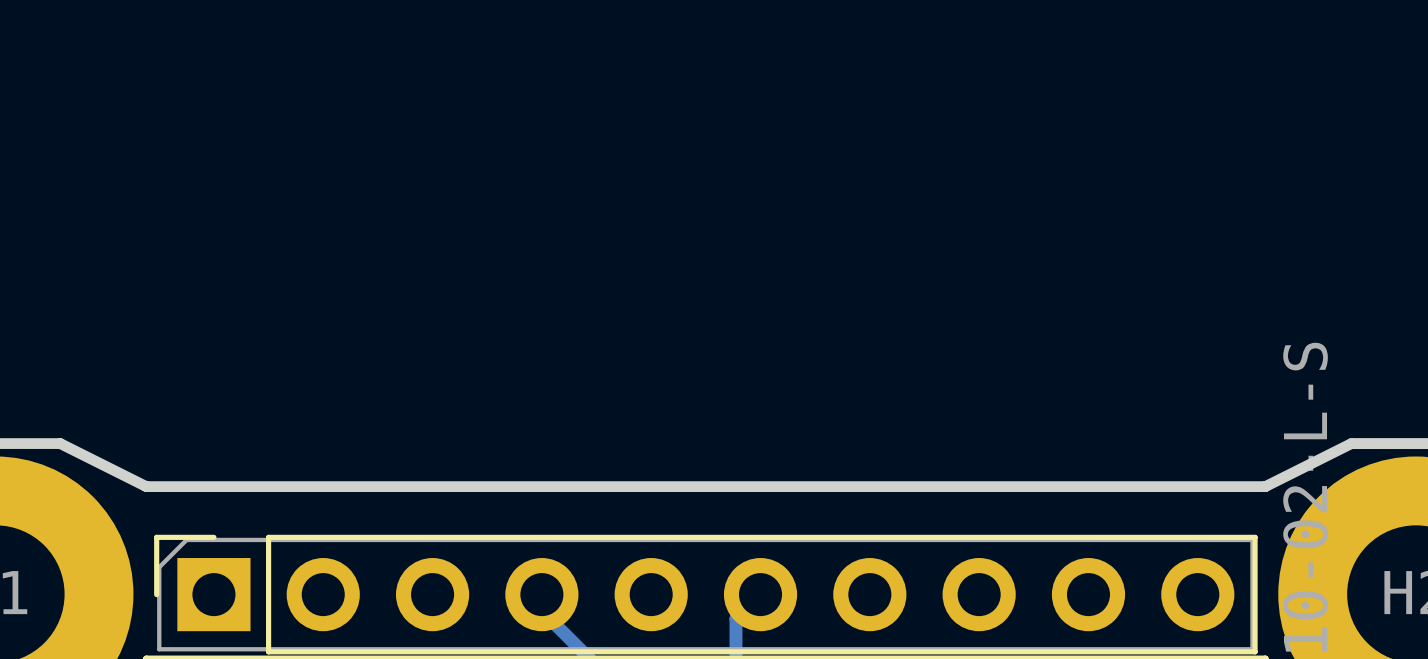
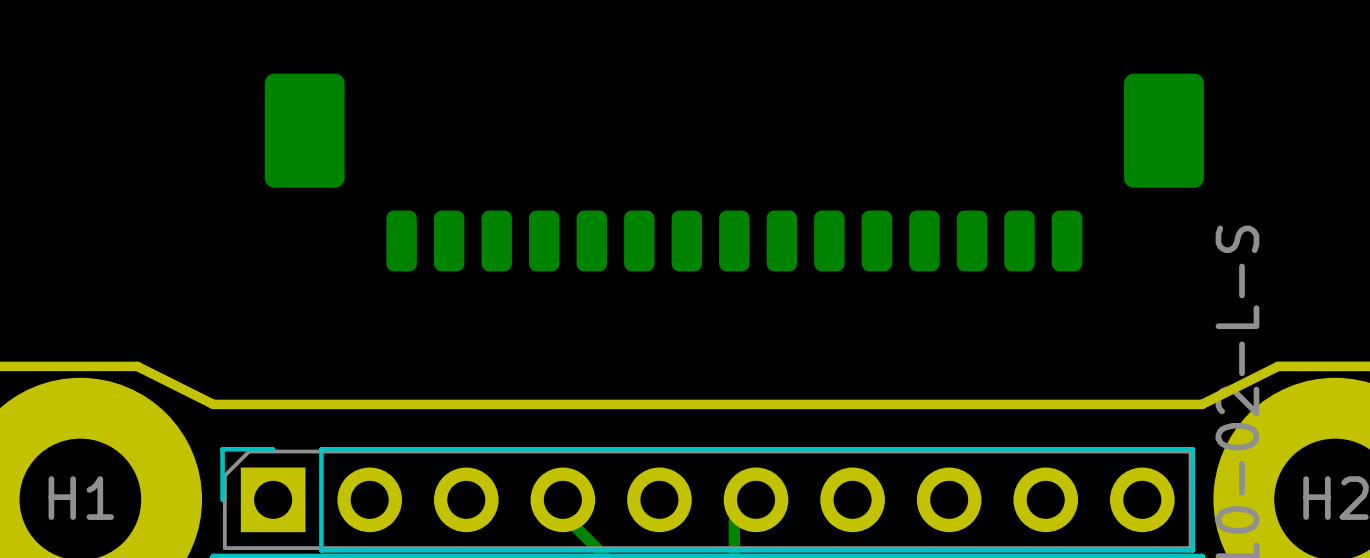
part: none -> (734, 172)

